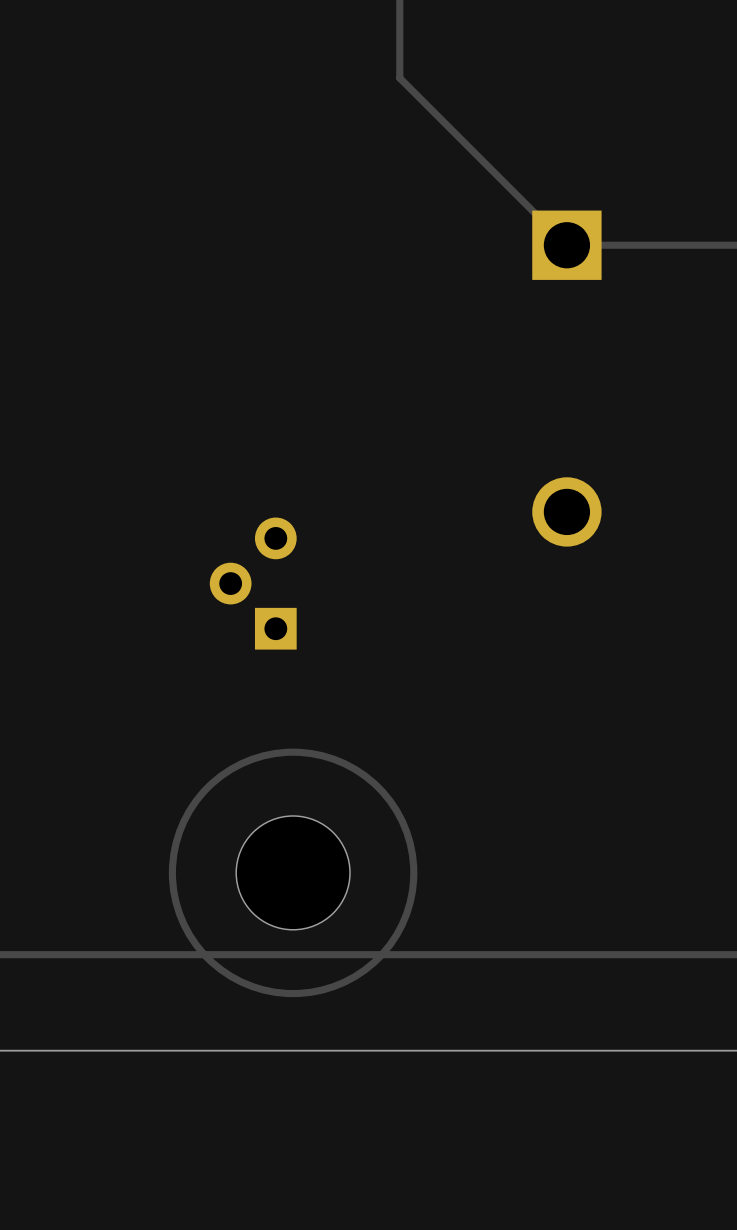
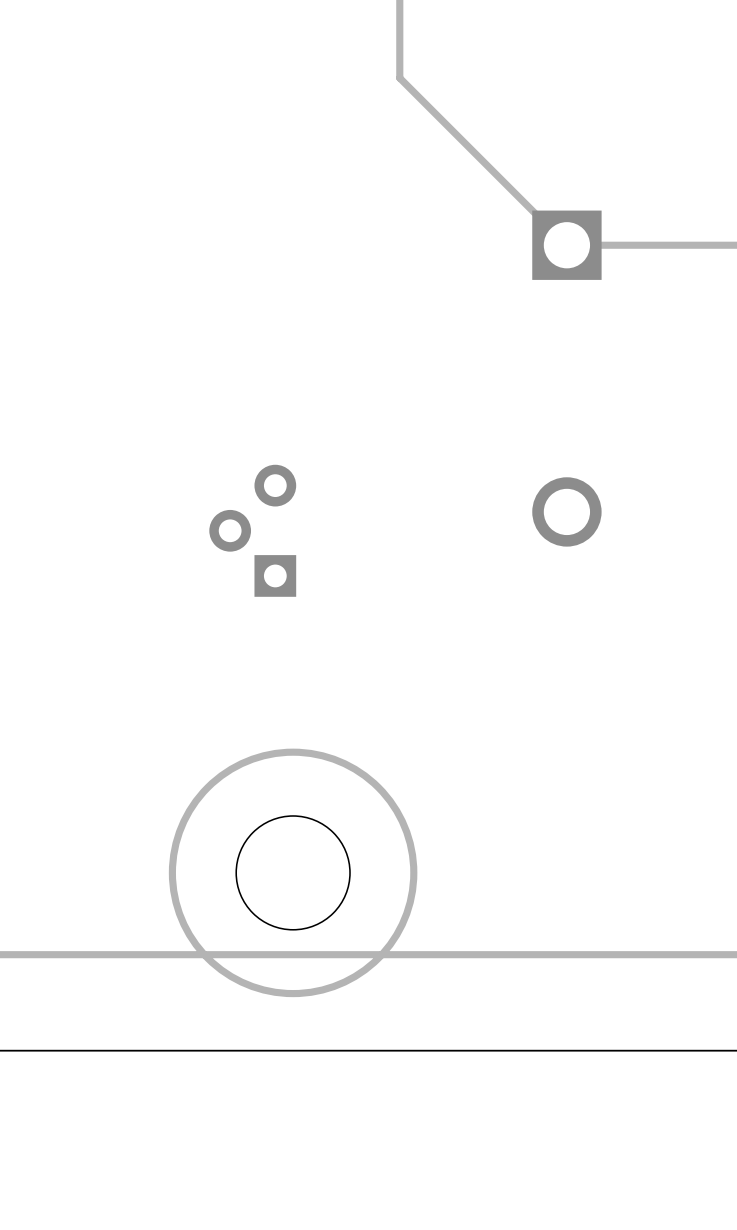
part position: (253, 583) -> (252, 530)

